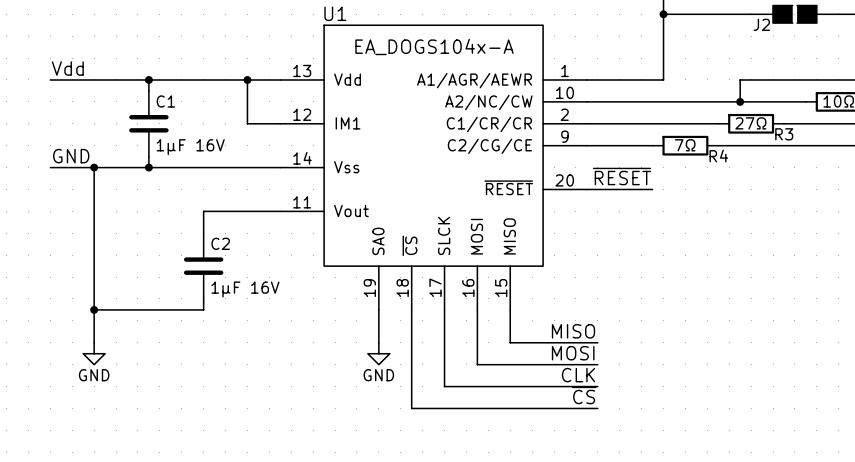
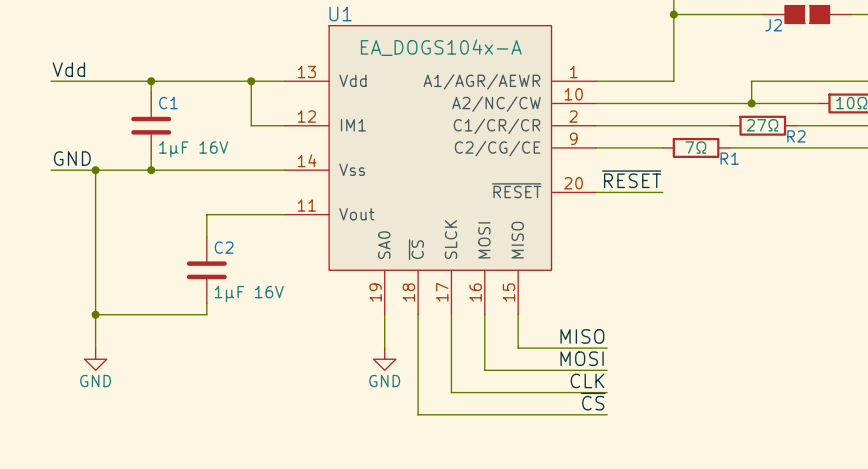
R3 name: R3 (784, 134) -> R2 (796, 136)
R4 name: R4 (718, 155) -> R1 (729, 158)

